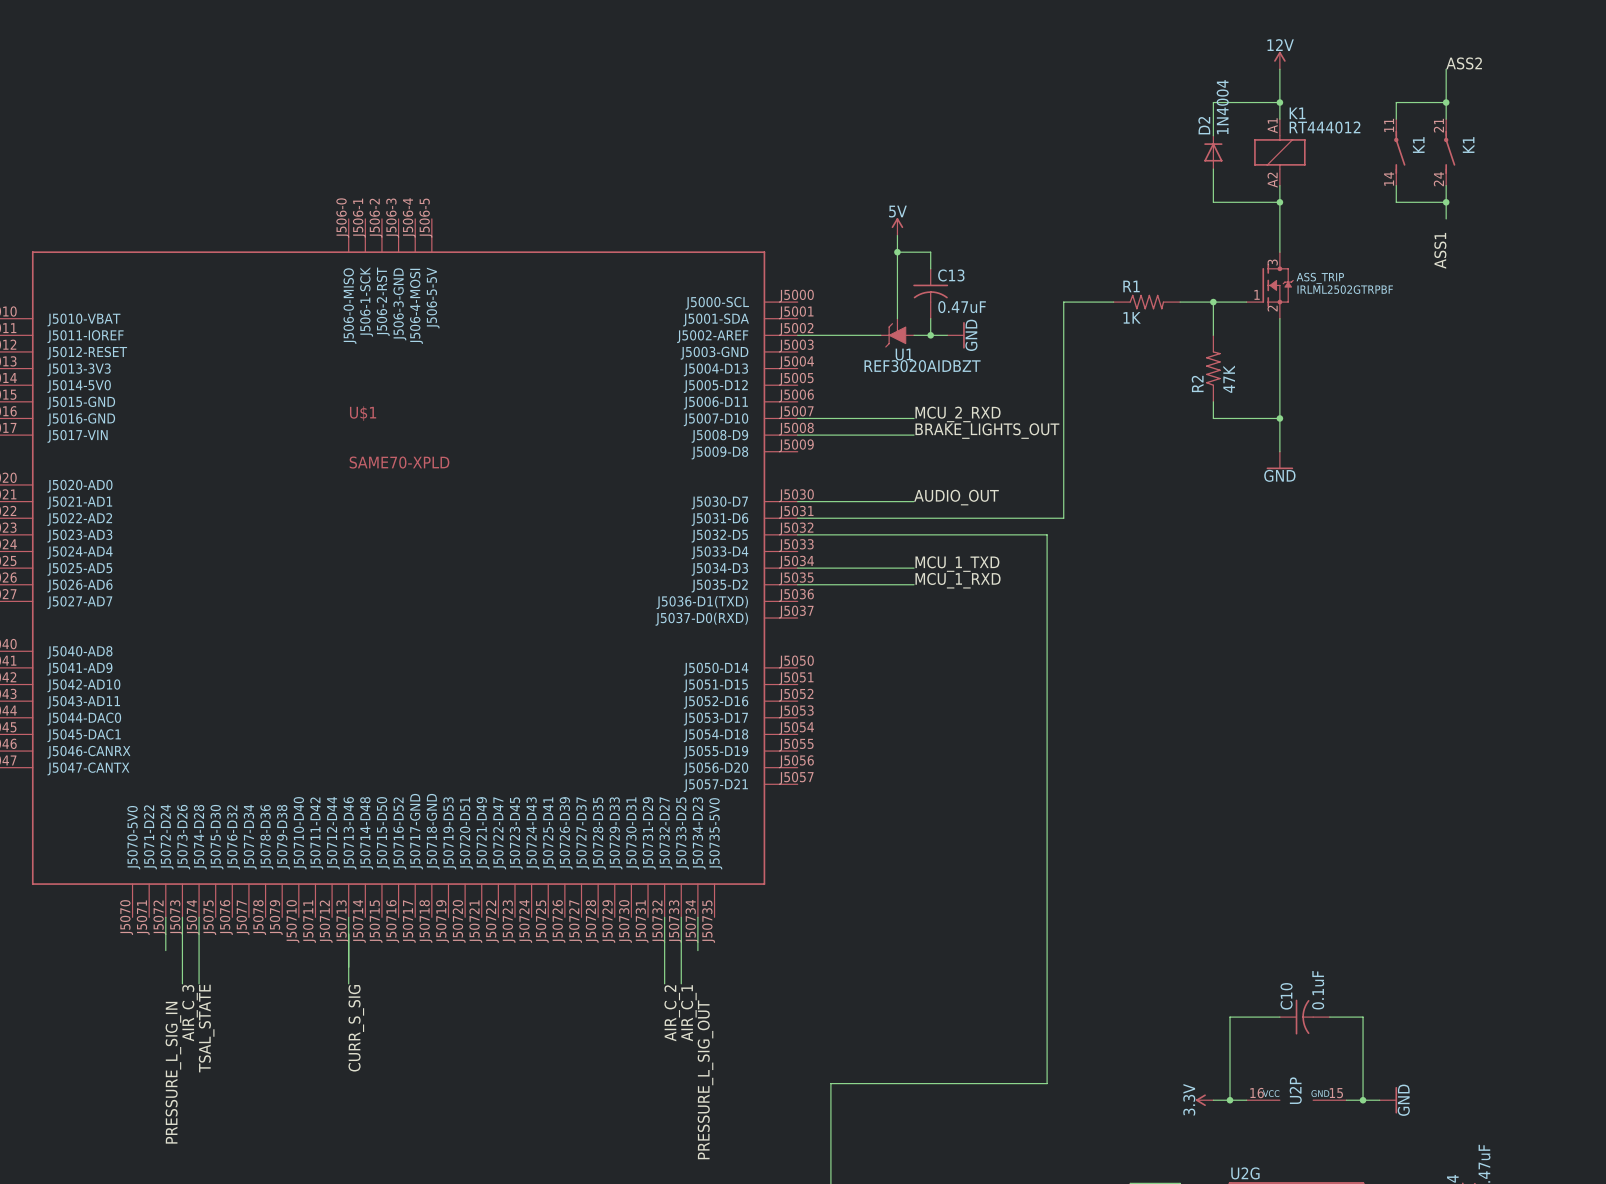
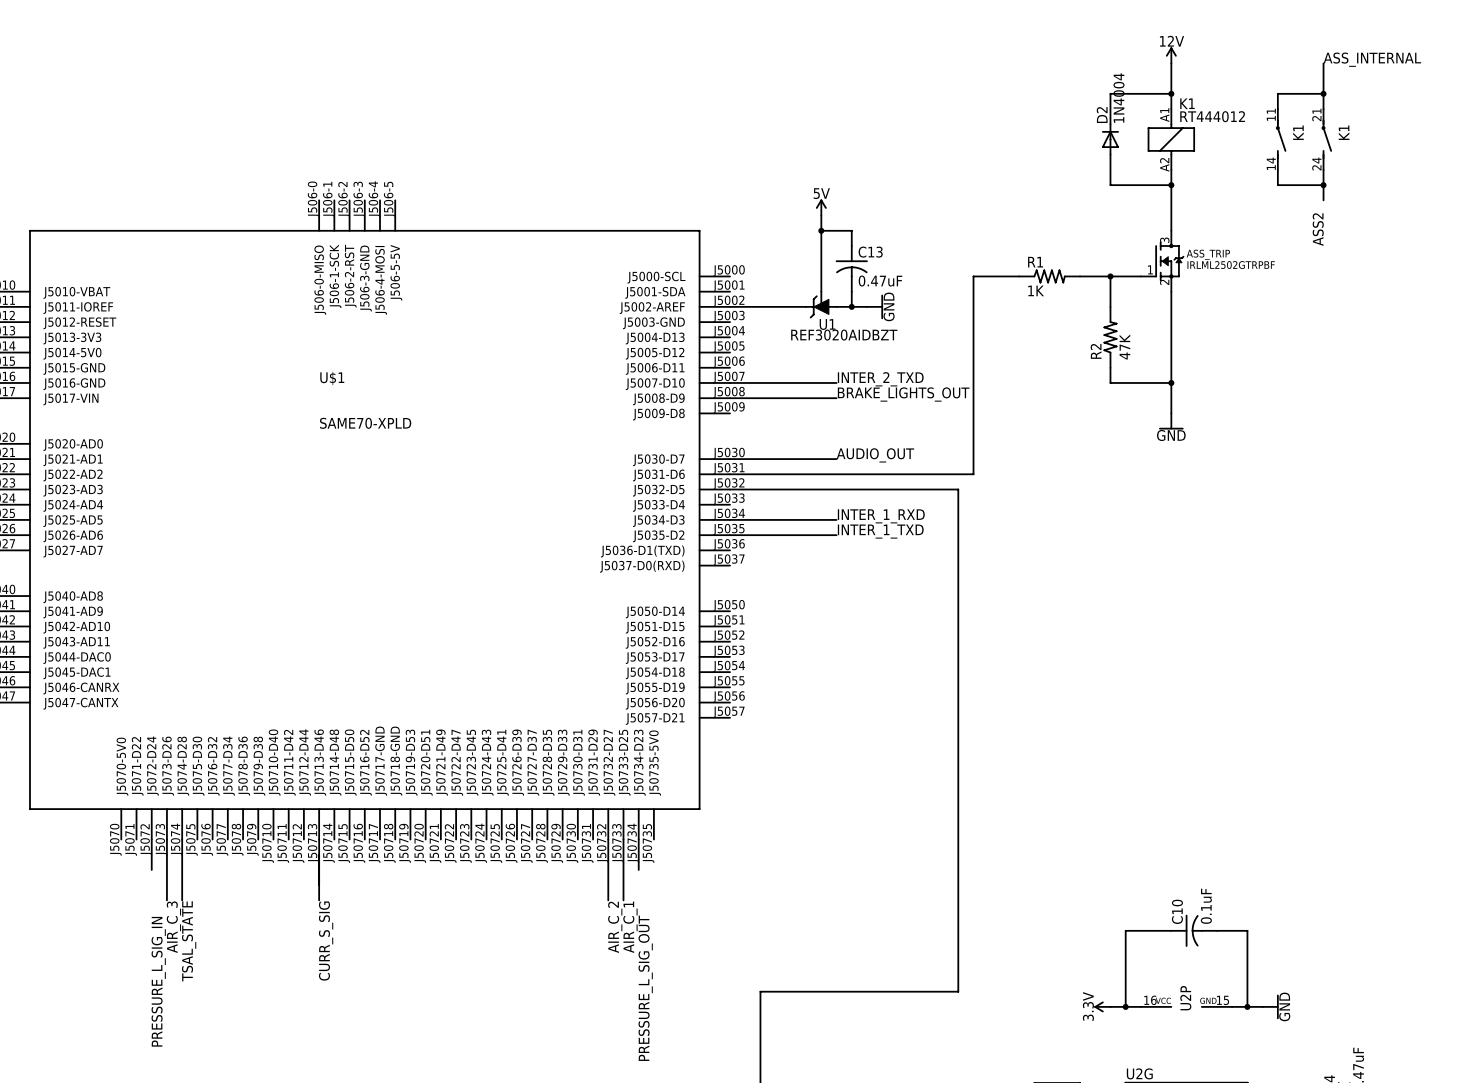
label: ASS2 (1464, 63) -> ASS_INTERNAL (1372, 59)
label: ASS1 (1440, 250) -> ASS2 (1318, 229)
label: MCU_2_RXD (958, 414) -> INTER_2_TXD (880, 379)
label: MCU_1_TXD (957, 564) -> INTER_1_RXD (881, 516)
label: MCU_1_RXD (958, 580) -> INTER_1_TXD (880, 531)

